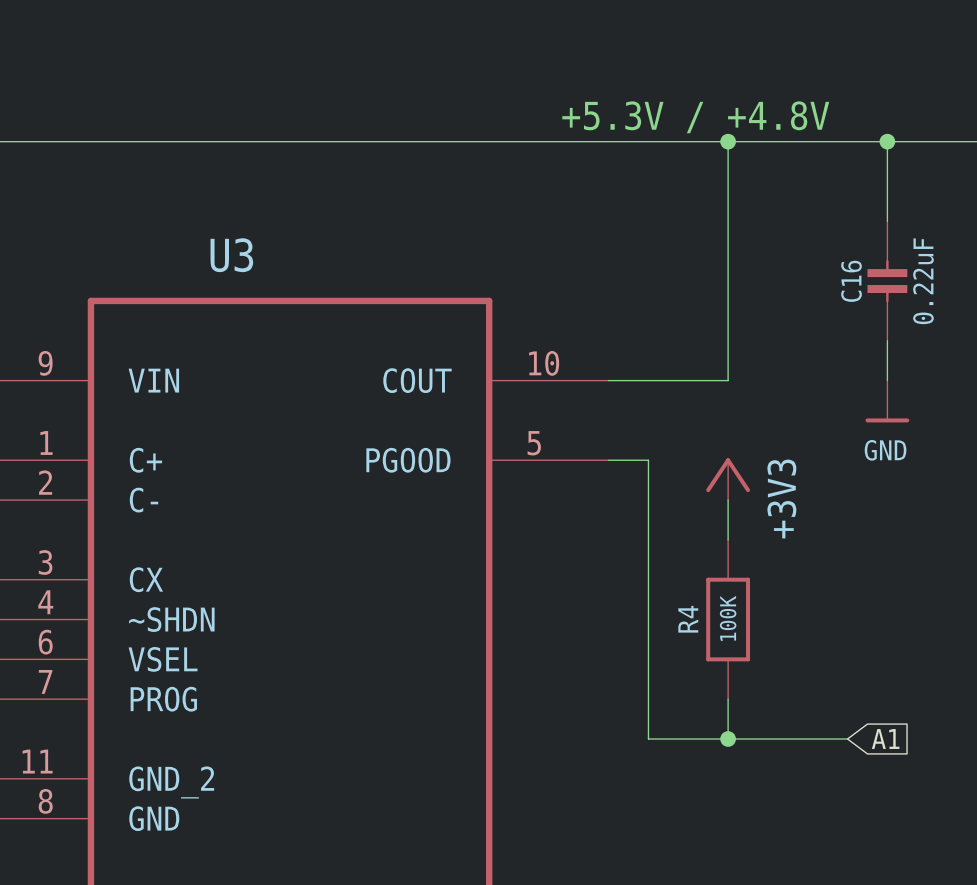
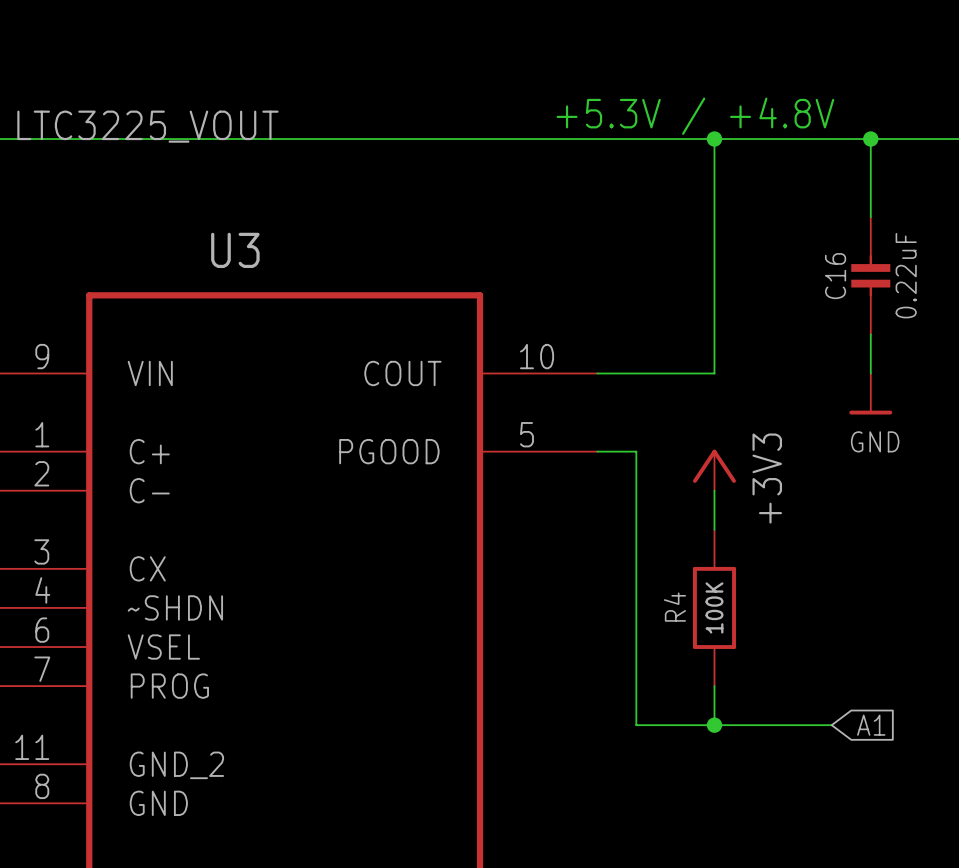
label: none -> LTC3225_VOUT (147, 126)

